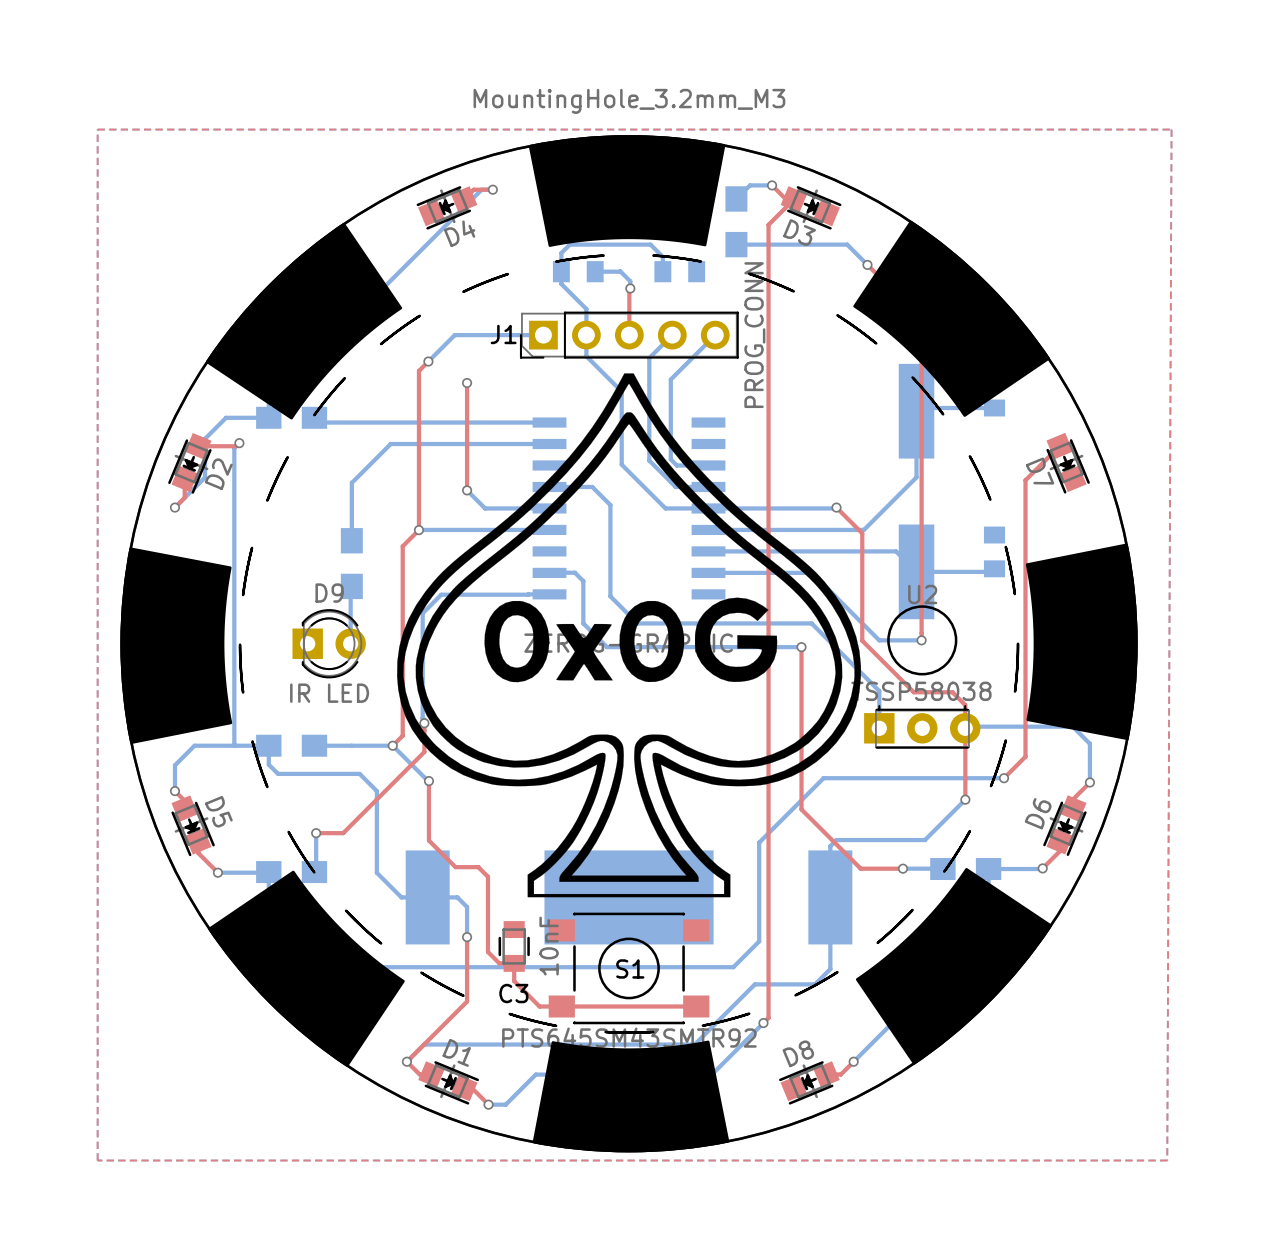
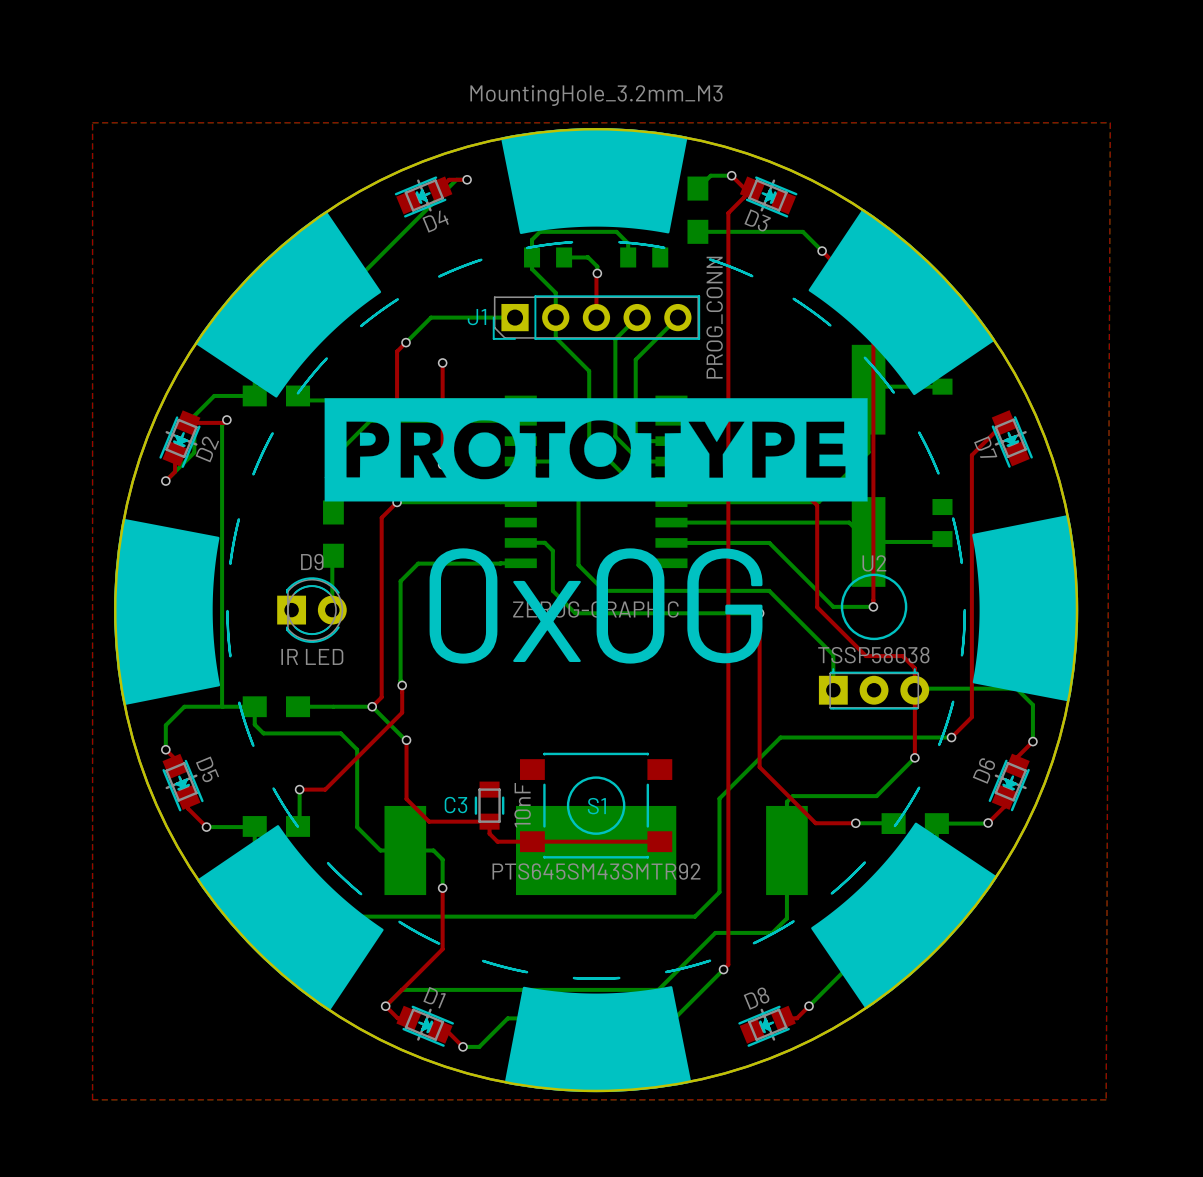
drawing: [397, 373, 861, 898] -> none
drawing: none -> [324, 398, 868, 502]
text: none -> 0x0G (596, 605)
top track: (428, 840) (455, 867) (478, 867) (487, 876) (487, 951) (499, 963) (514, 963) (514, 981) (539, 1006) (696, 1006) -> (406, 796) (406, 799) (429, 821) (489, 821) (489, 833) (497, 841) (659, 841)
C3 position: (514, 946) -> (489, 805)
S1 position: (629, 968) -> (596, 805)
C3 name position: C3 (513, 993) -> C3 (455, 805)

